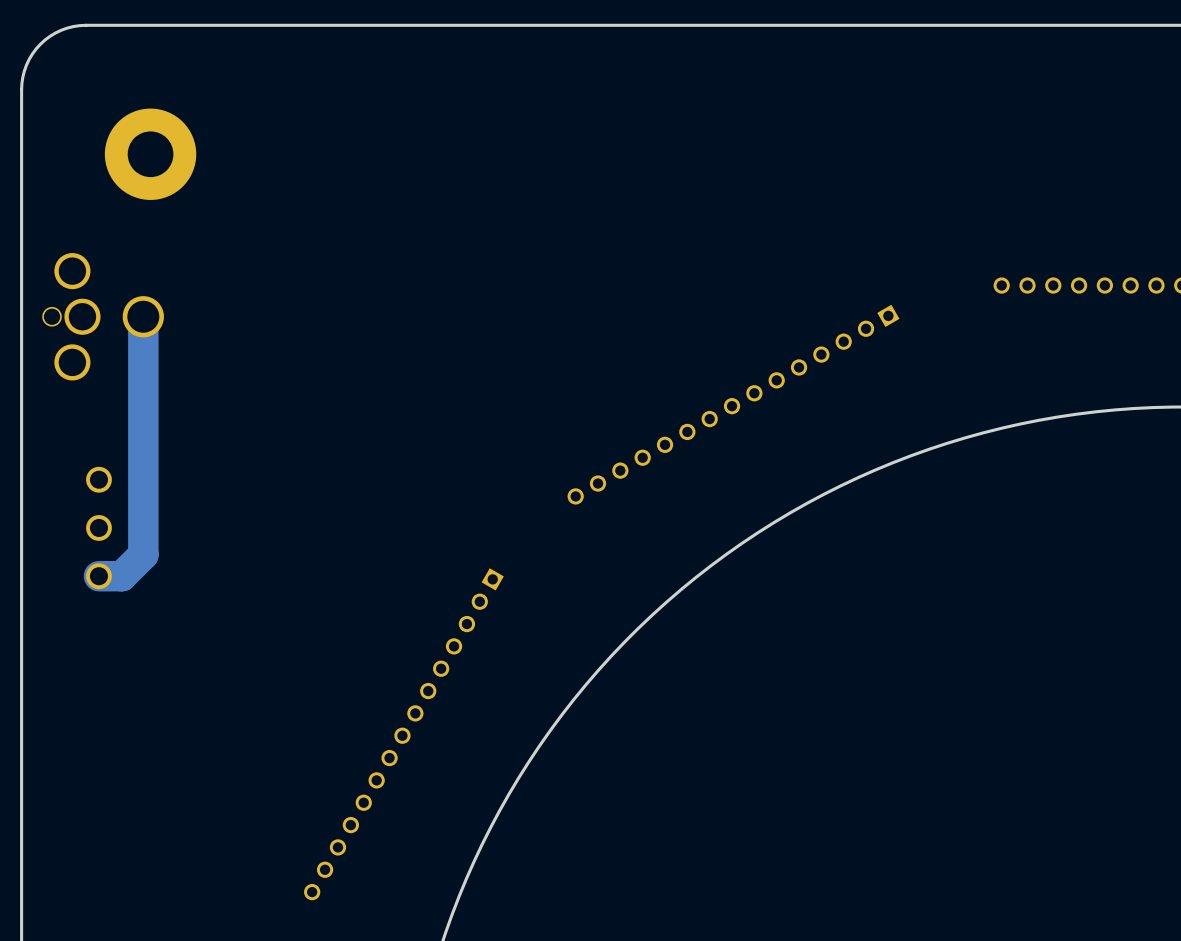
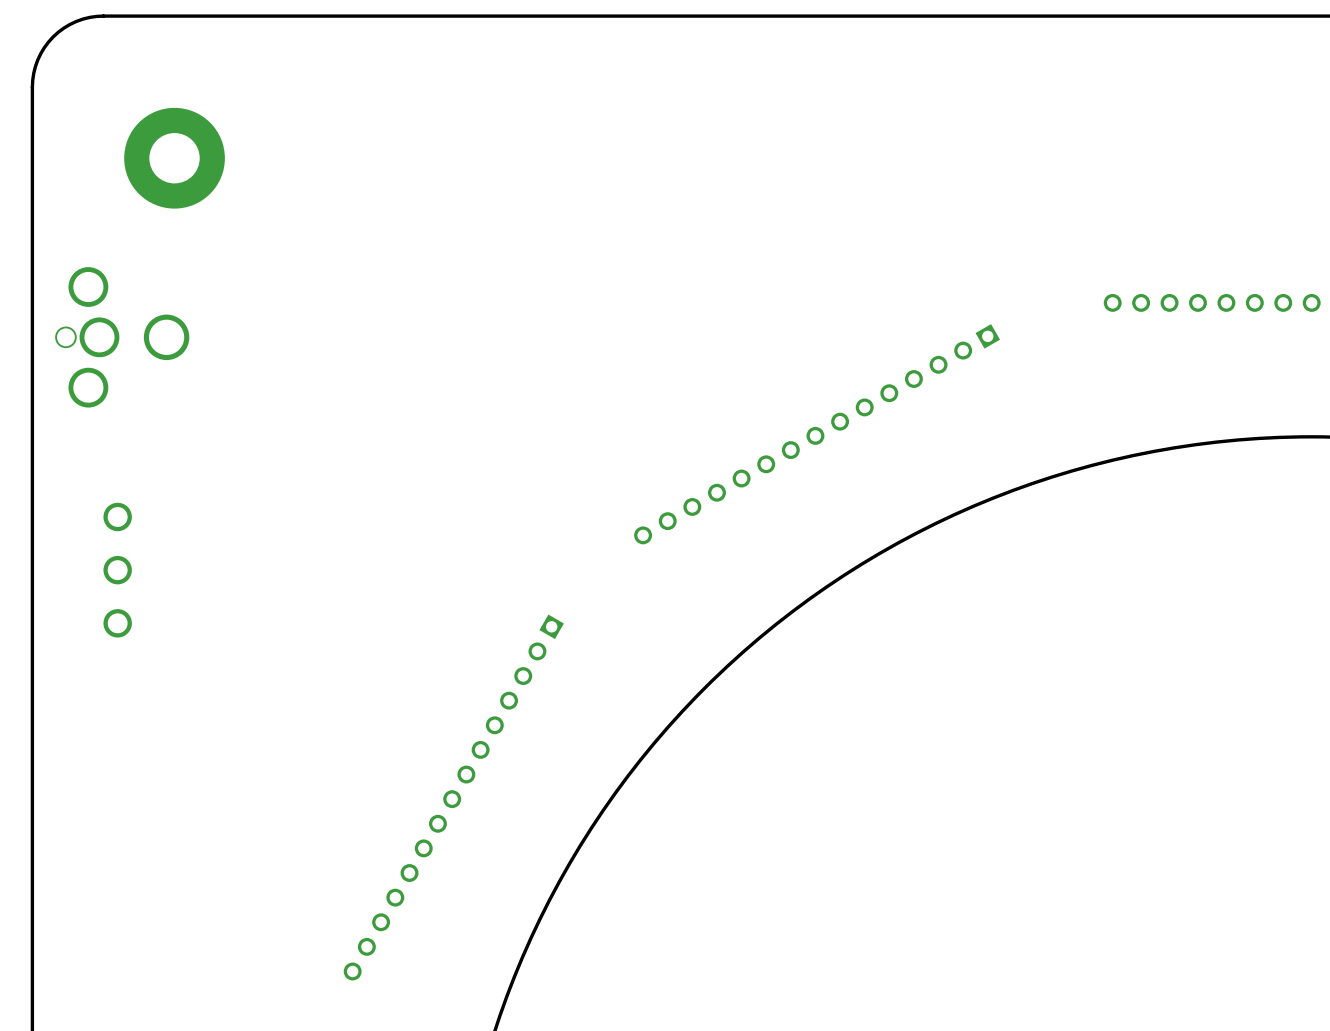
track: (143, 316) (143, 554) (121, 576) (98, 576) -> none

